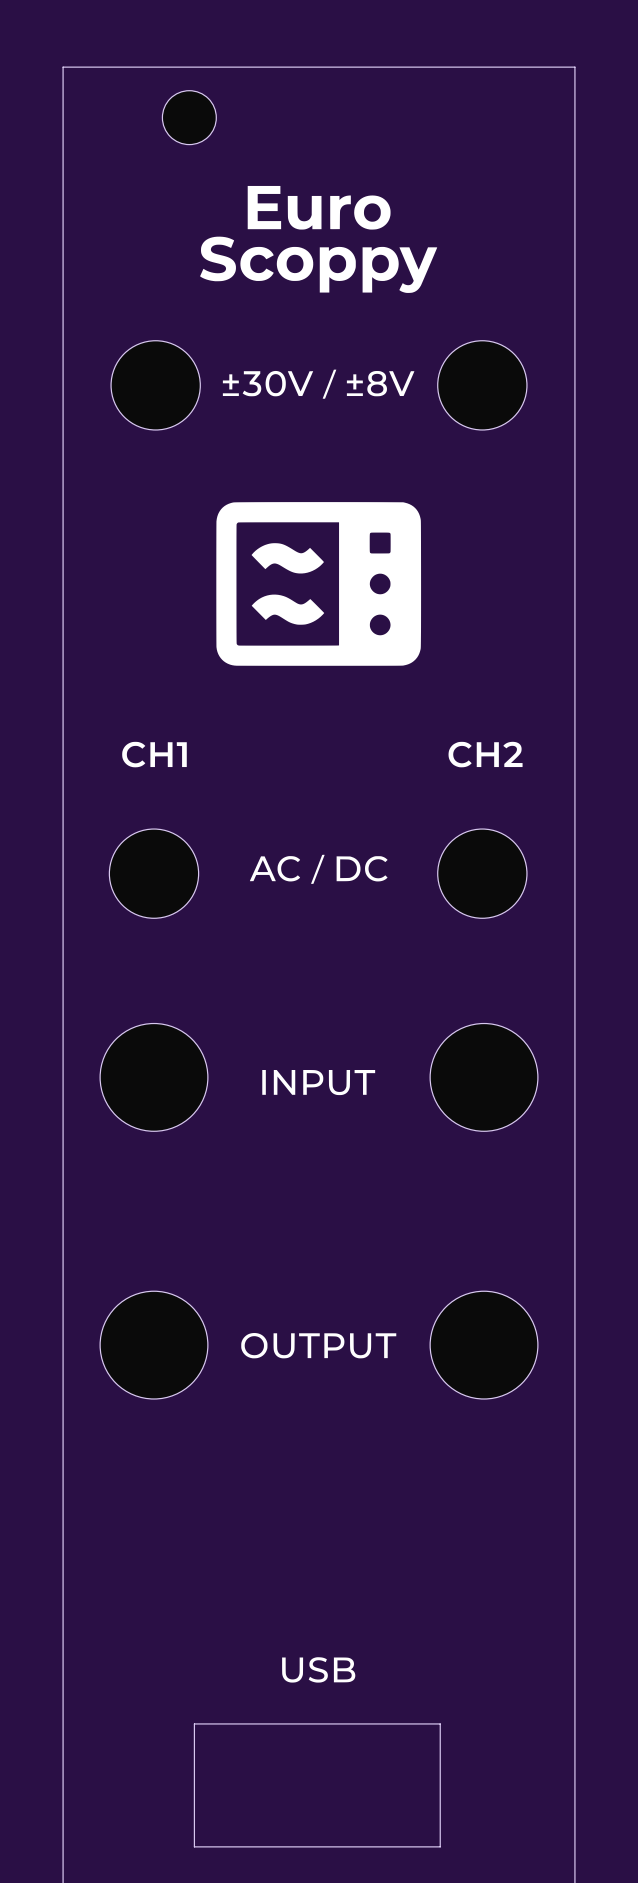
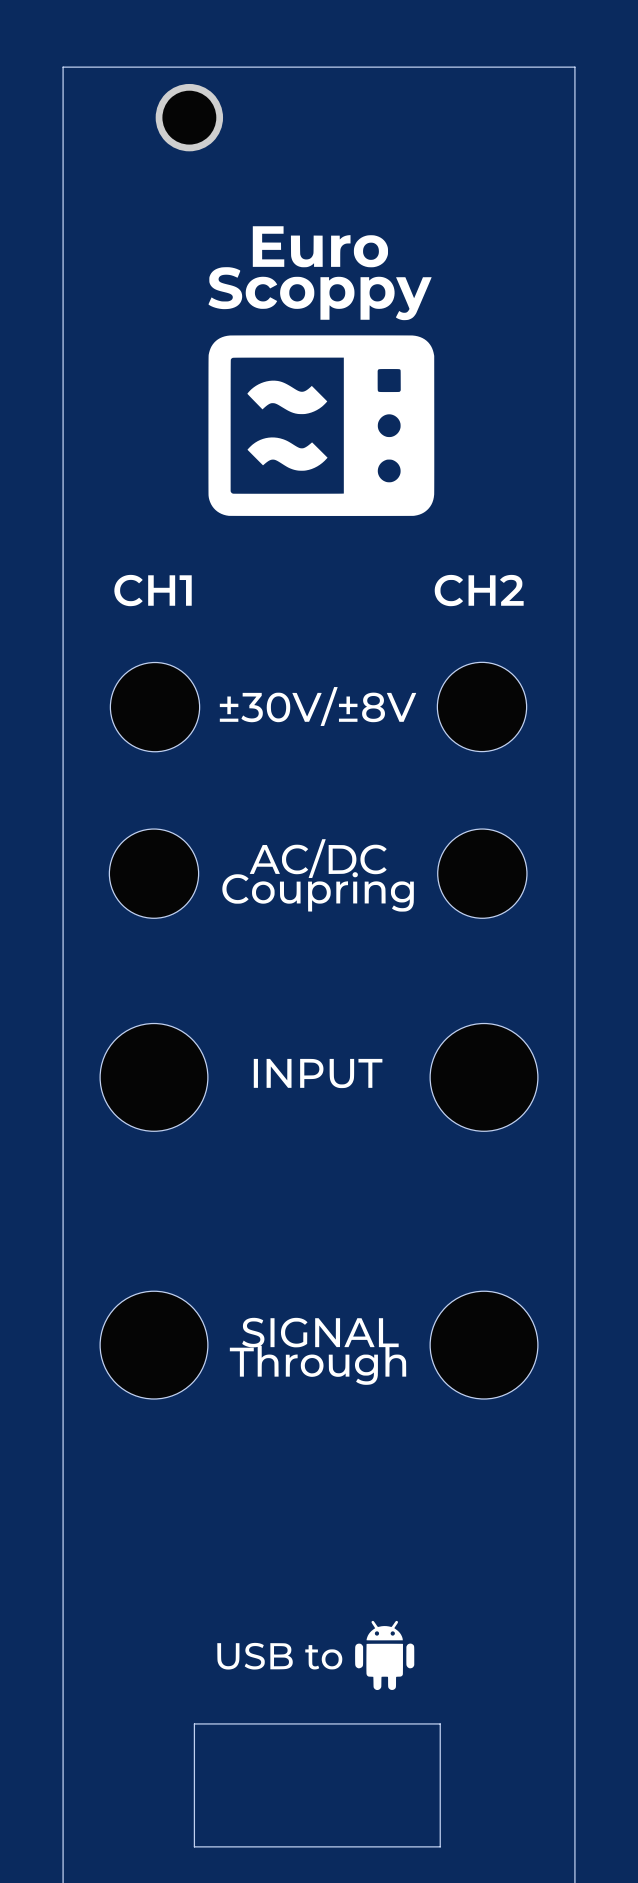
part footprint: [162, 90, 217, 145] -> [155, 83, 224, 152]
drawing: [122, 185, 523, 1683] -> none
drawing: none -> [114, 226, 524, 1691]
part: (155, 385) -> none
part: (482, 385) -> none
part: none -> (482, 706)
part: none -> (155, 707)

